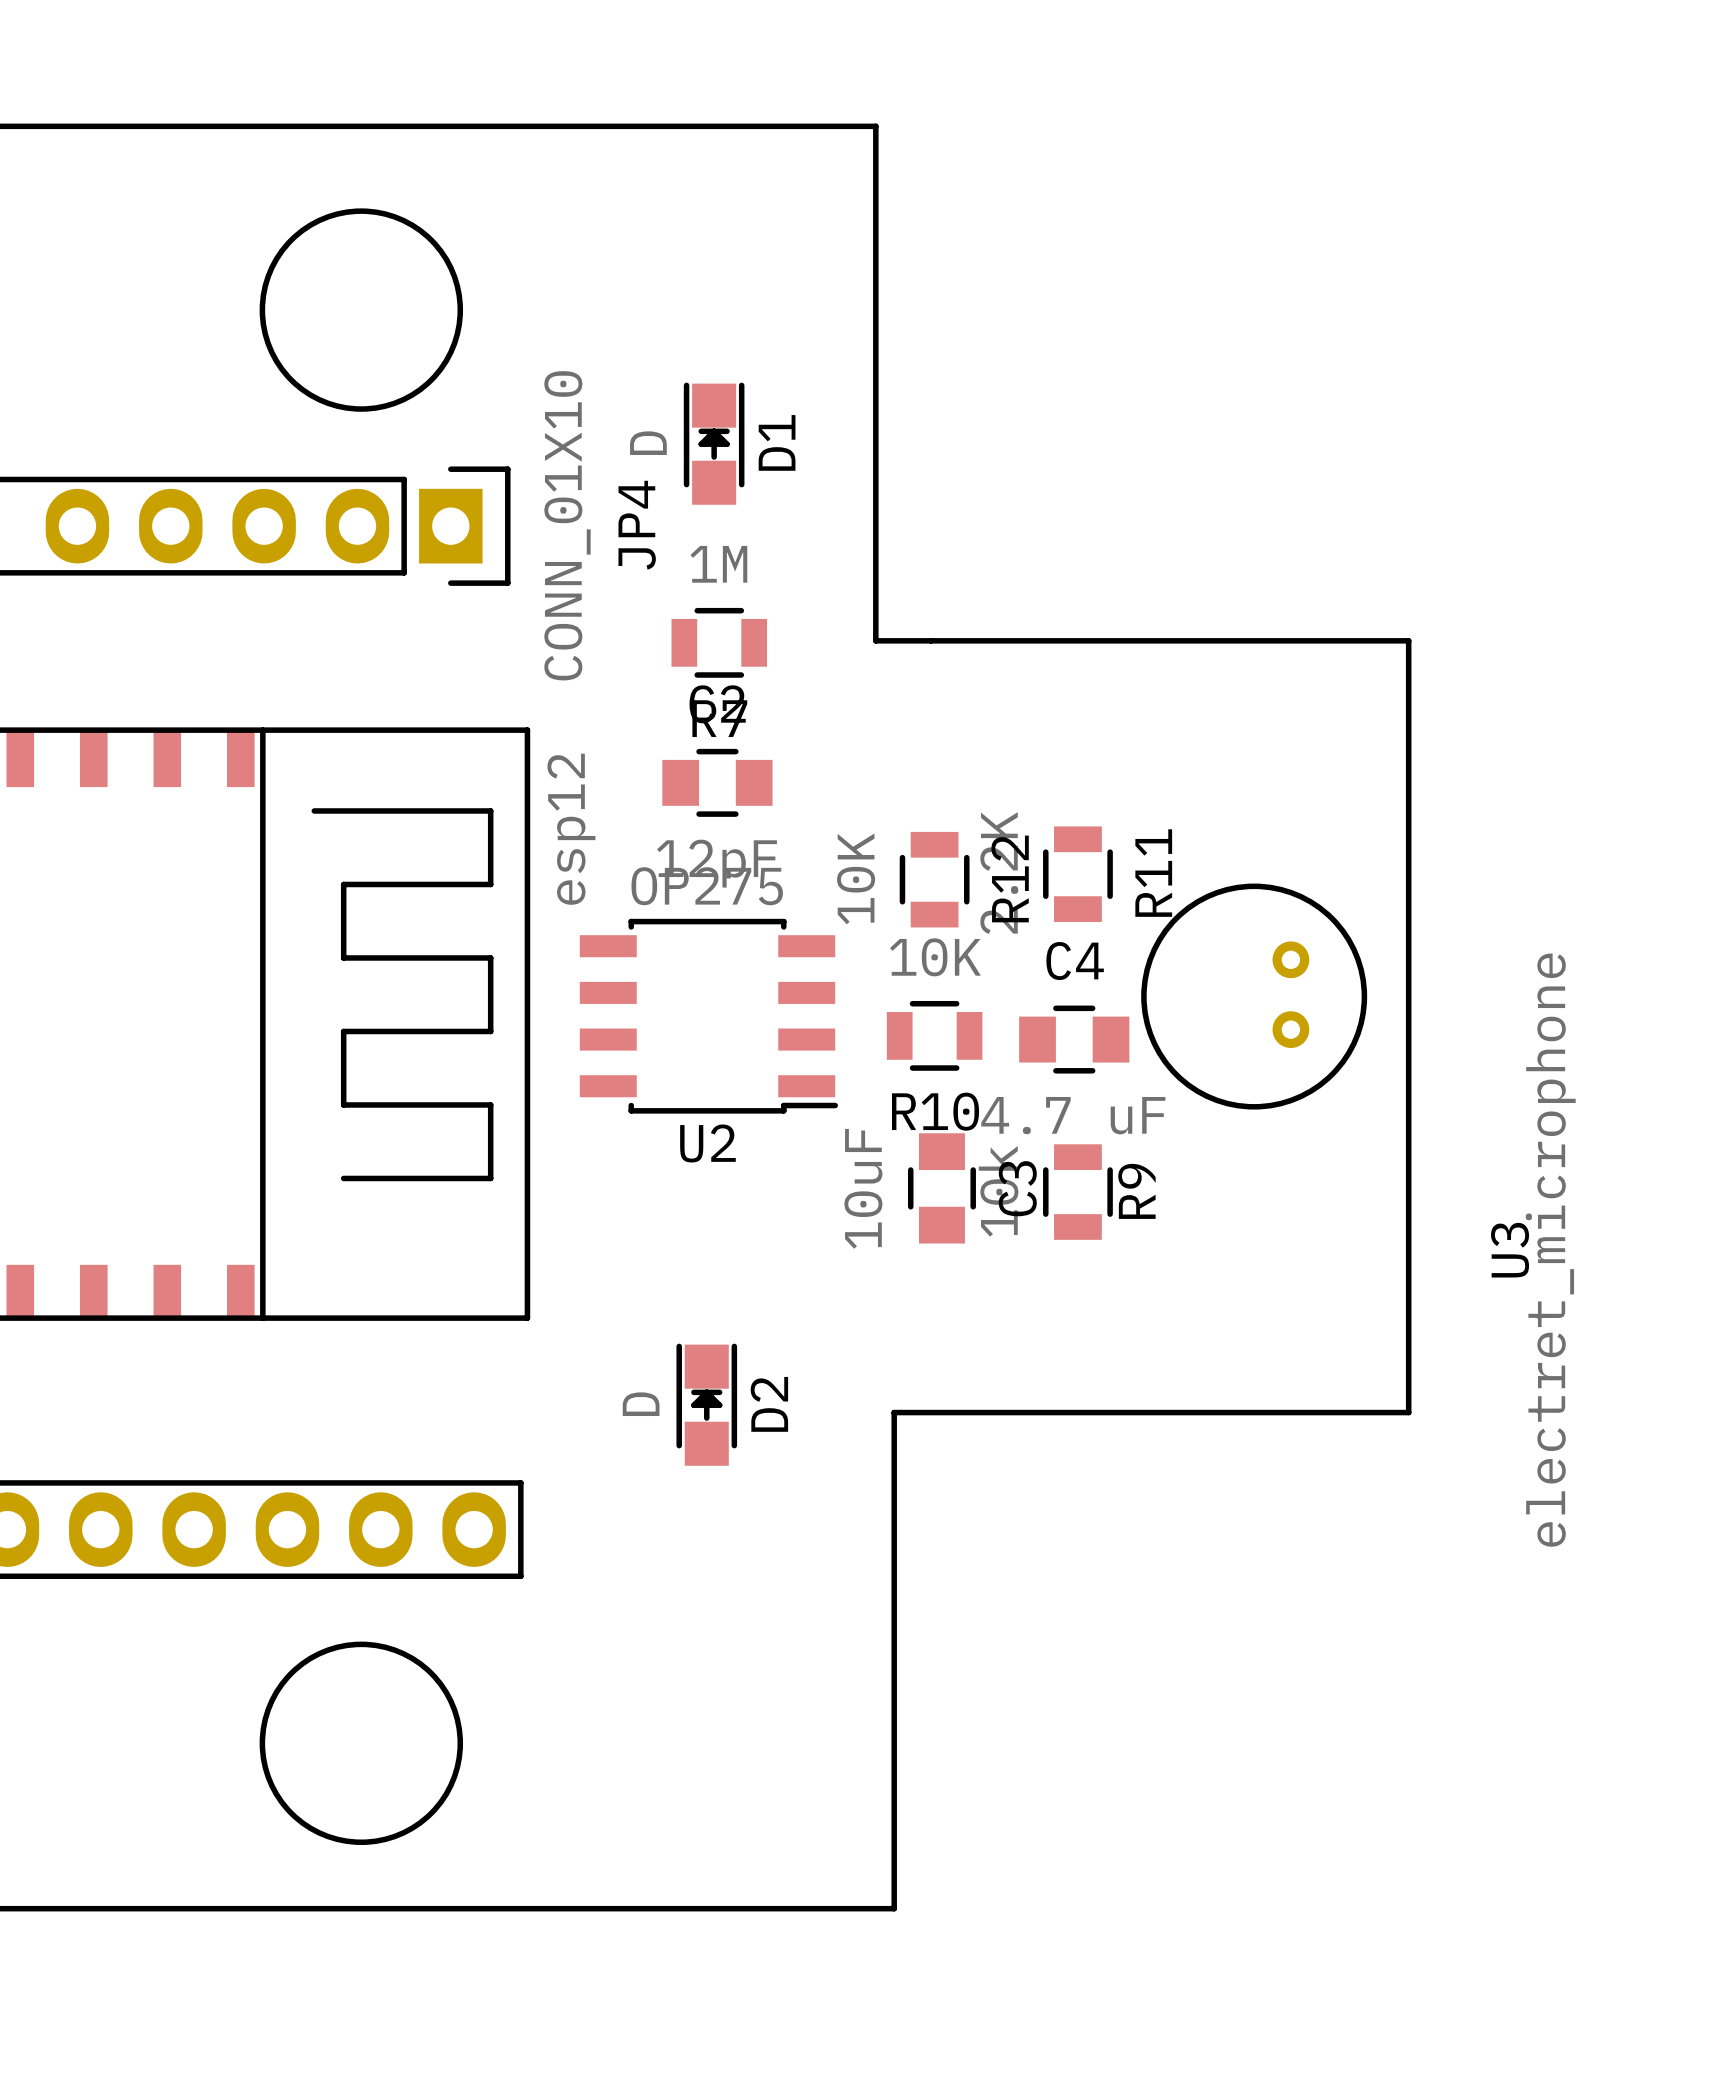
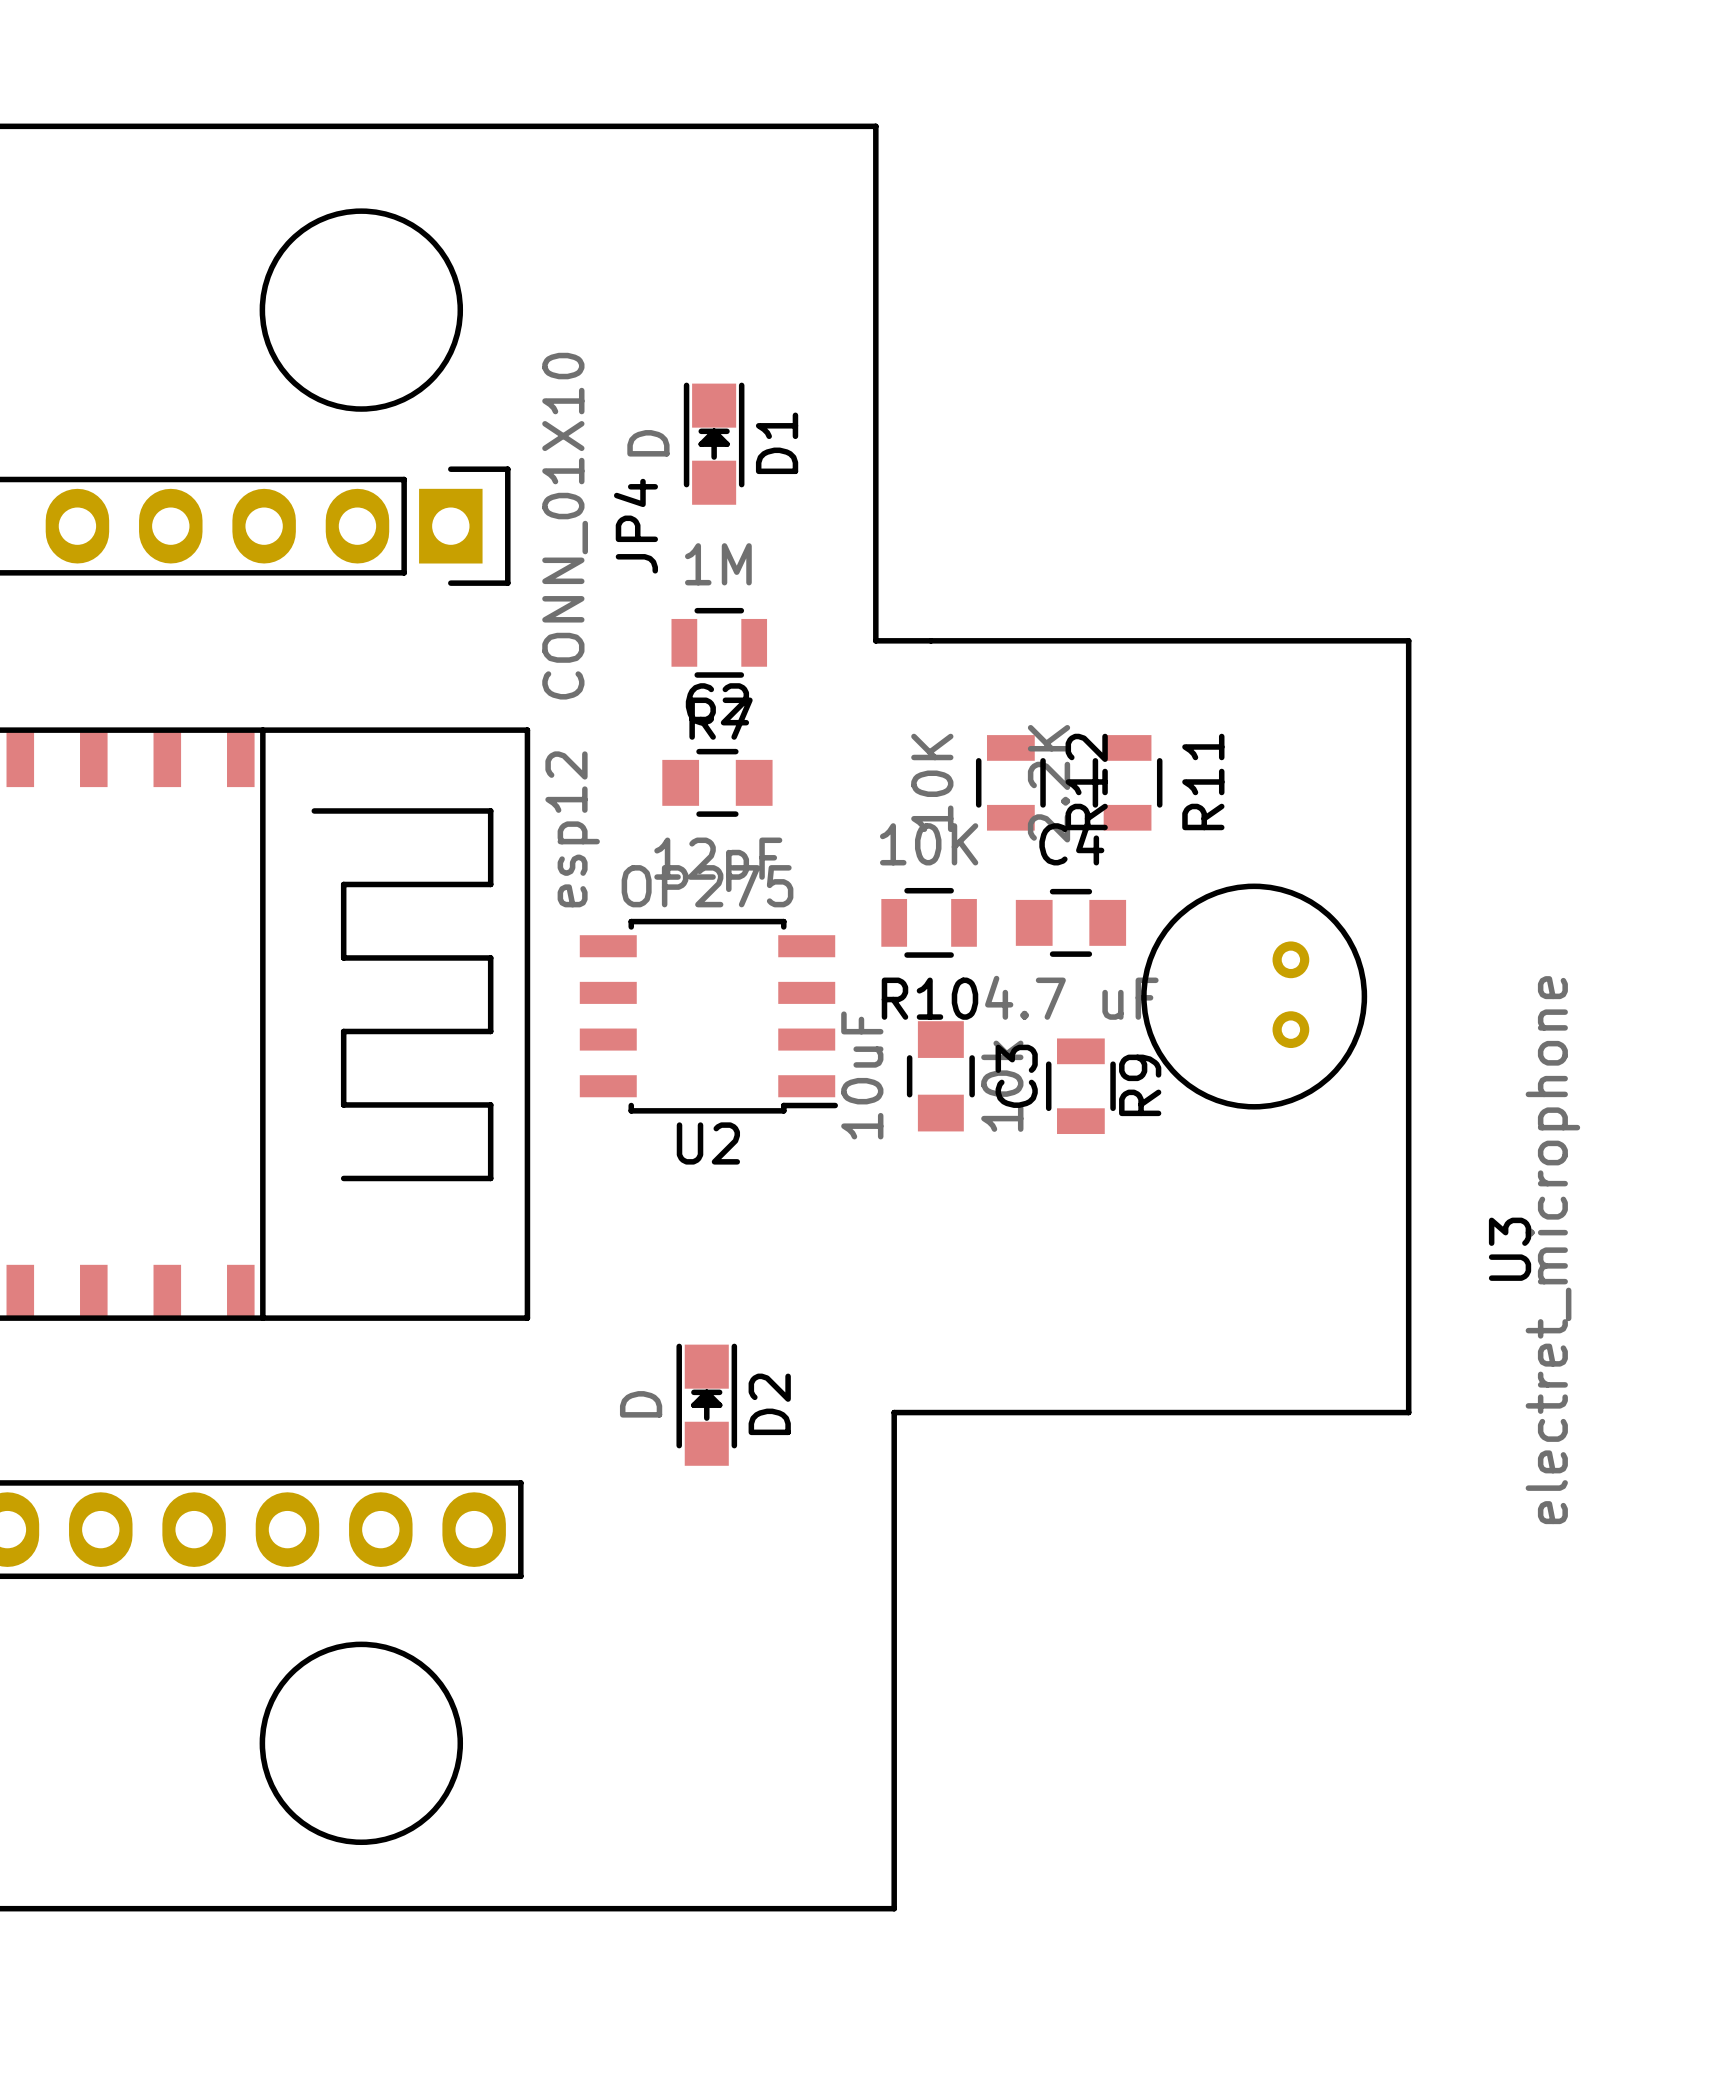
R11 position: (1077, 874) -> (1127, 782)
R12 position: (934, 879) -> (1010, 782)
R10 position: (934, 1035) -> (929, 922)
C4 position: (1074, 1039) -> (1070, 922)
C3 position: (941, 1188) -> (940, 1076)
R9 position: (1077, 1192) -> (1080, 1086)

